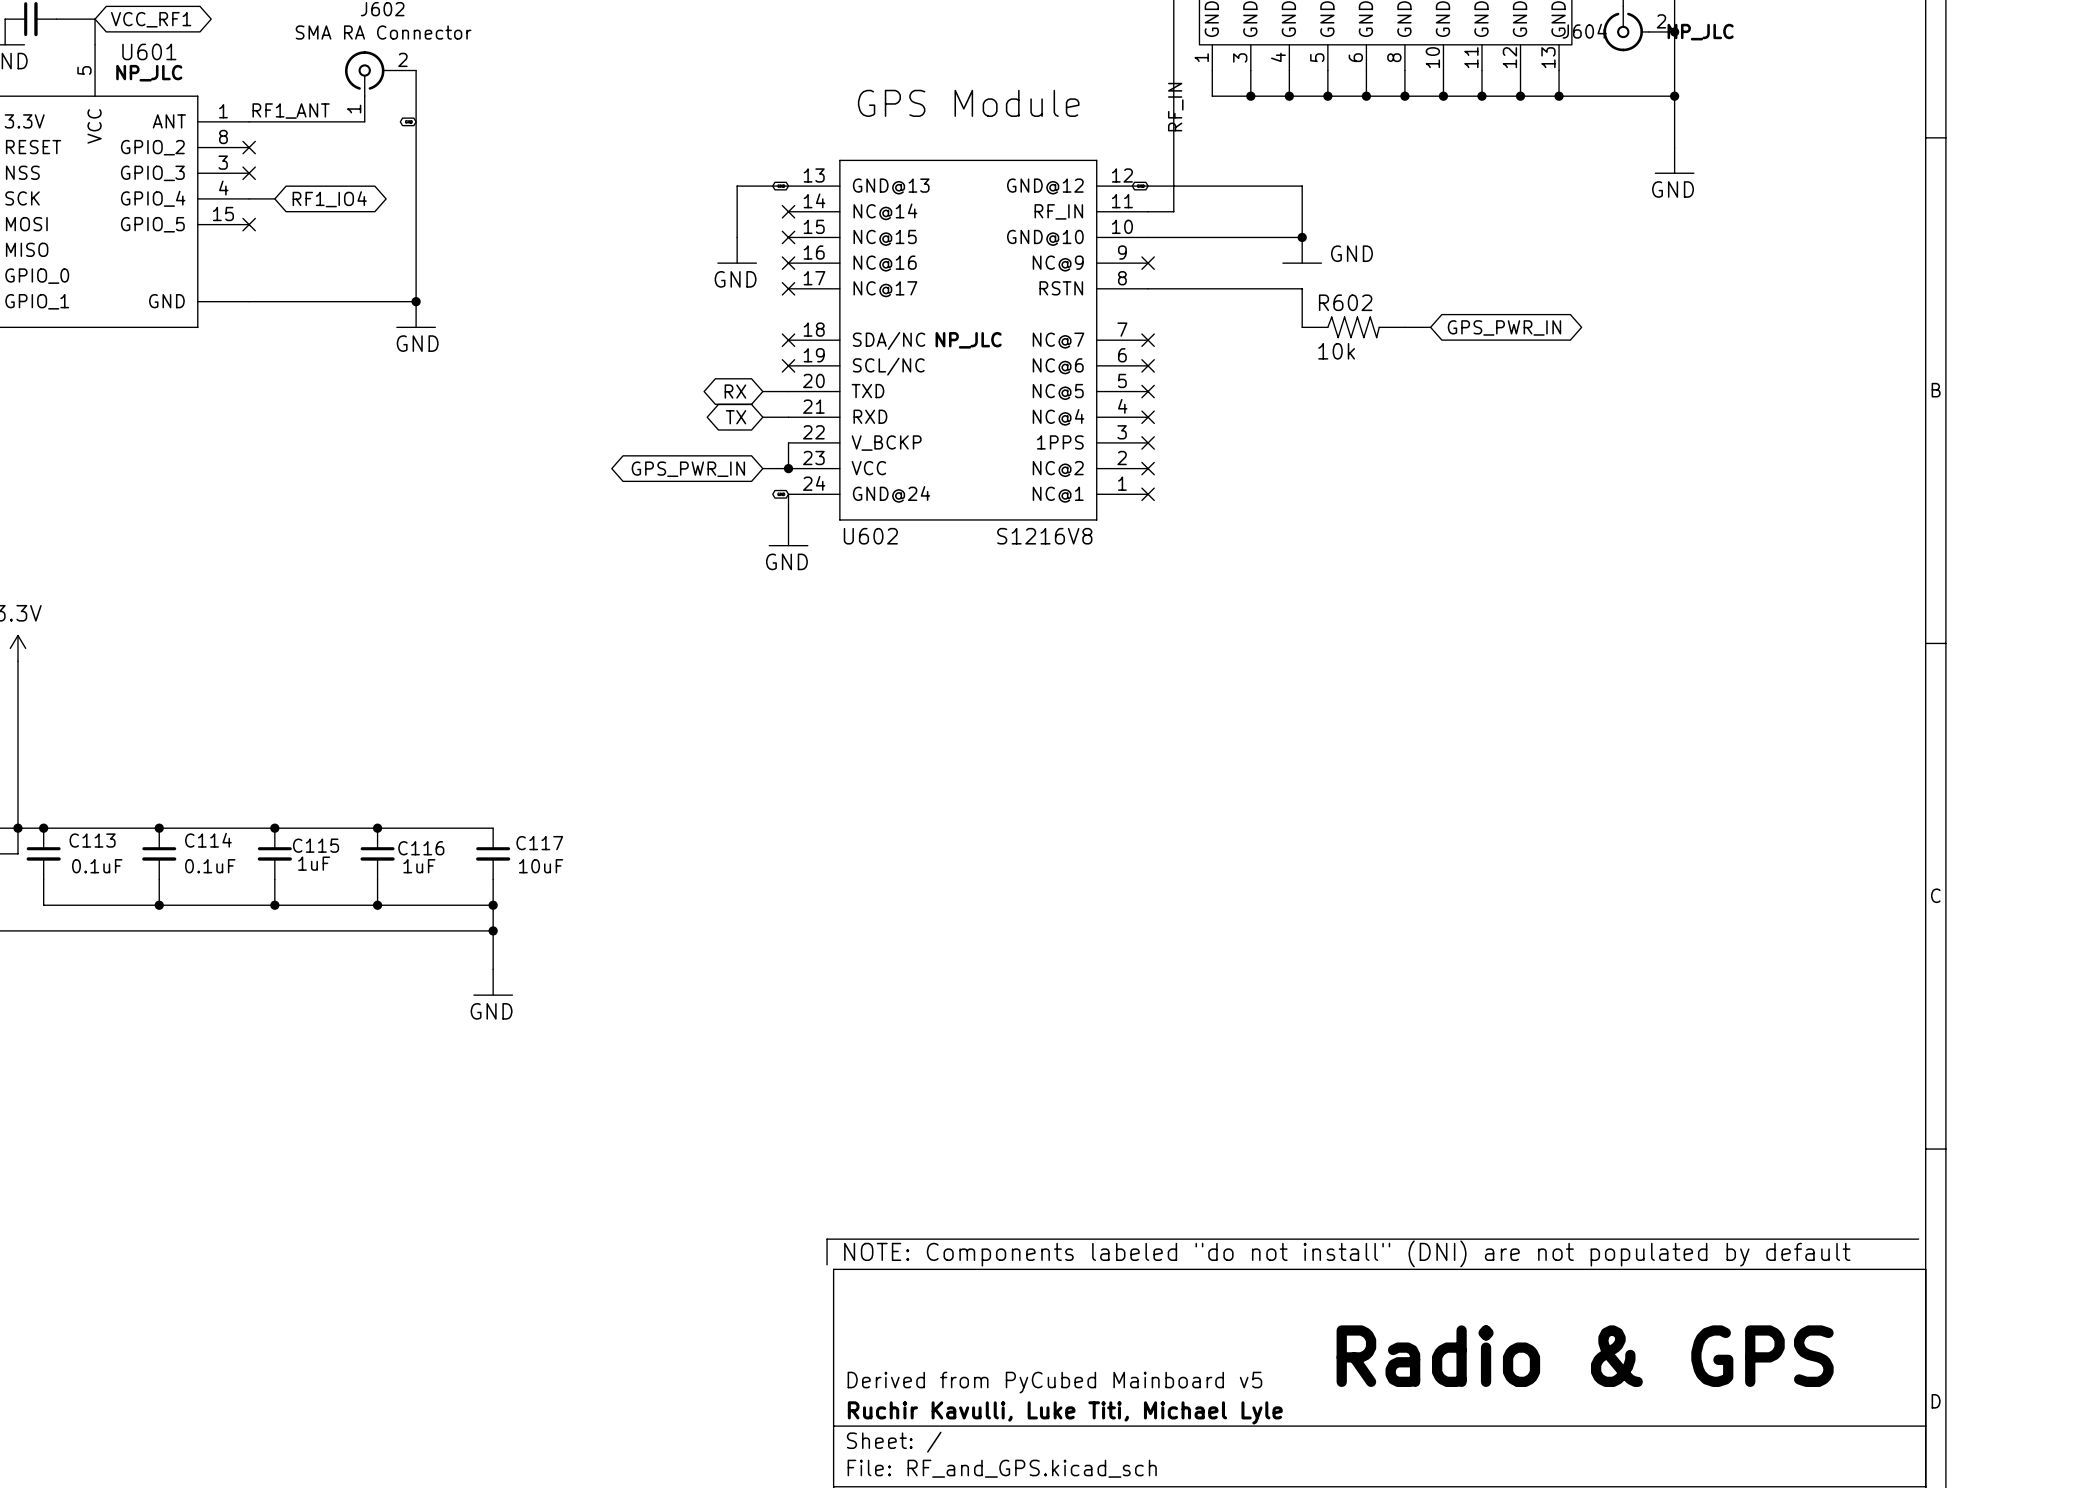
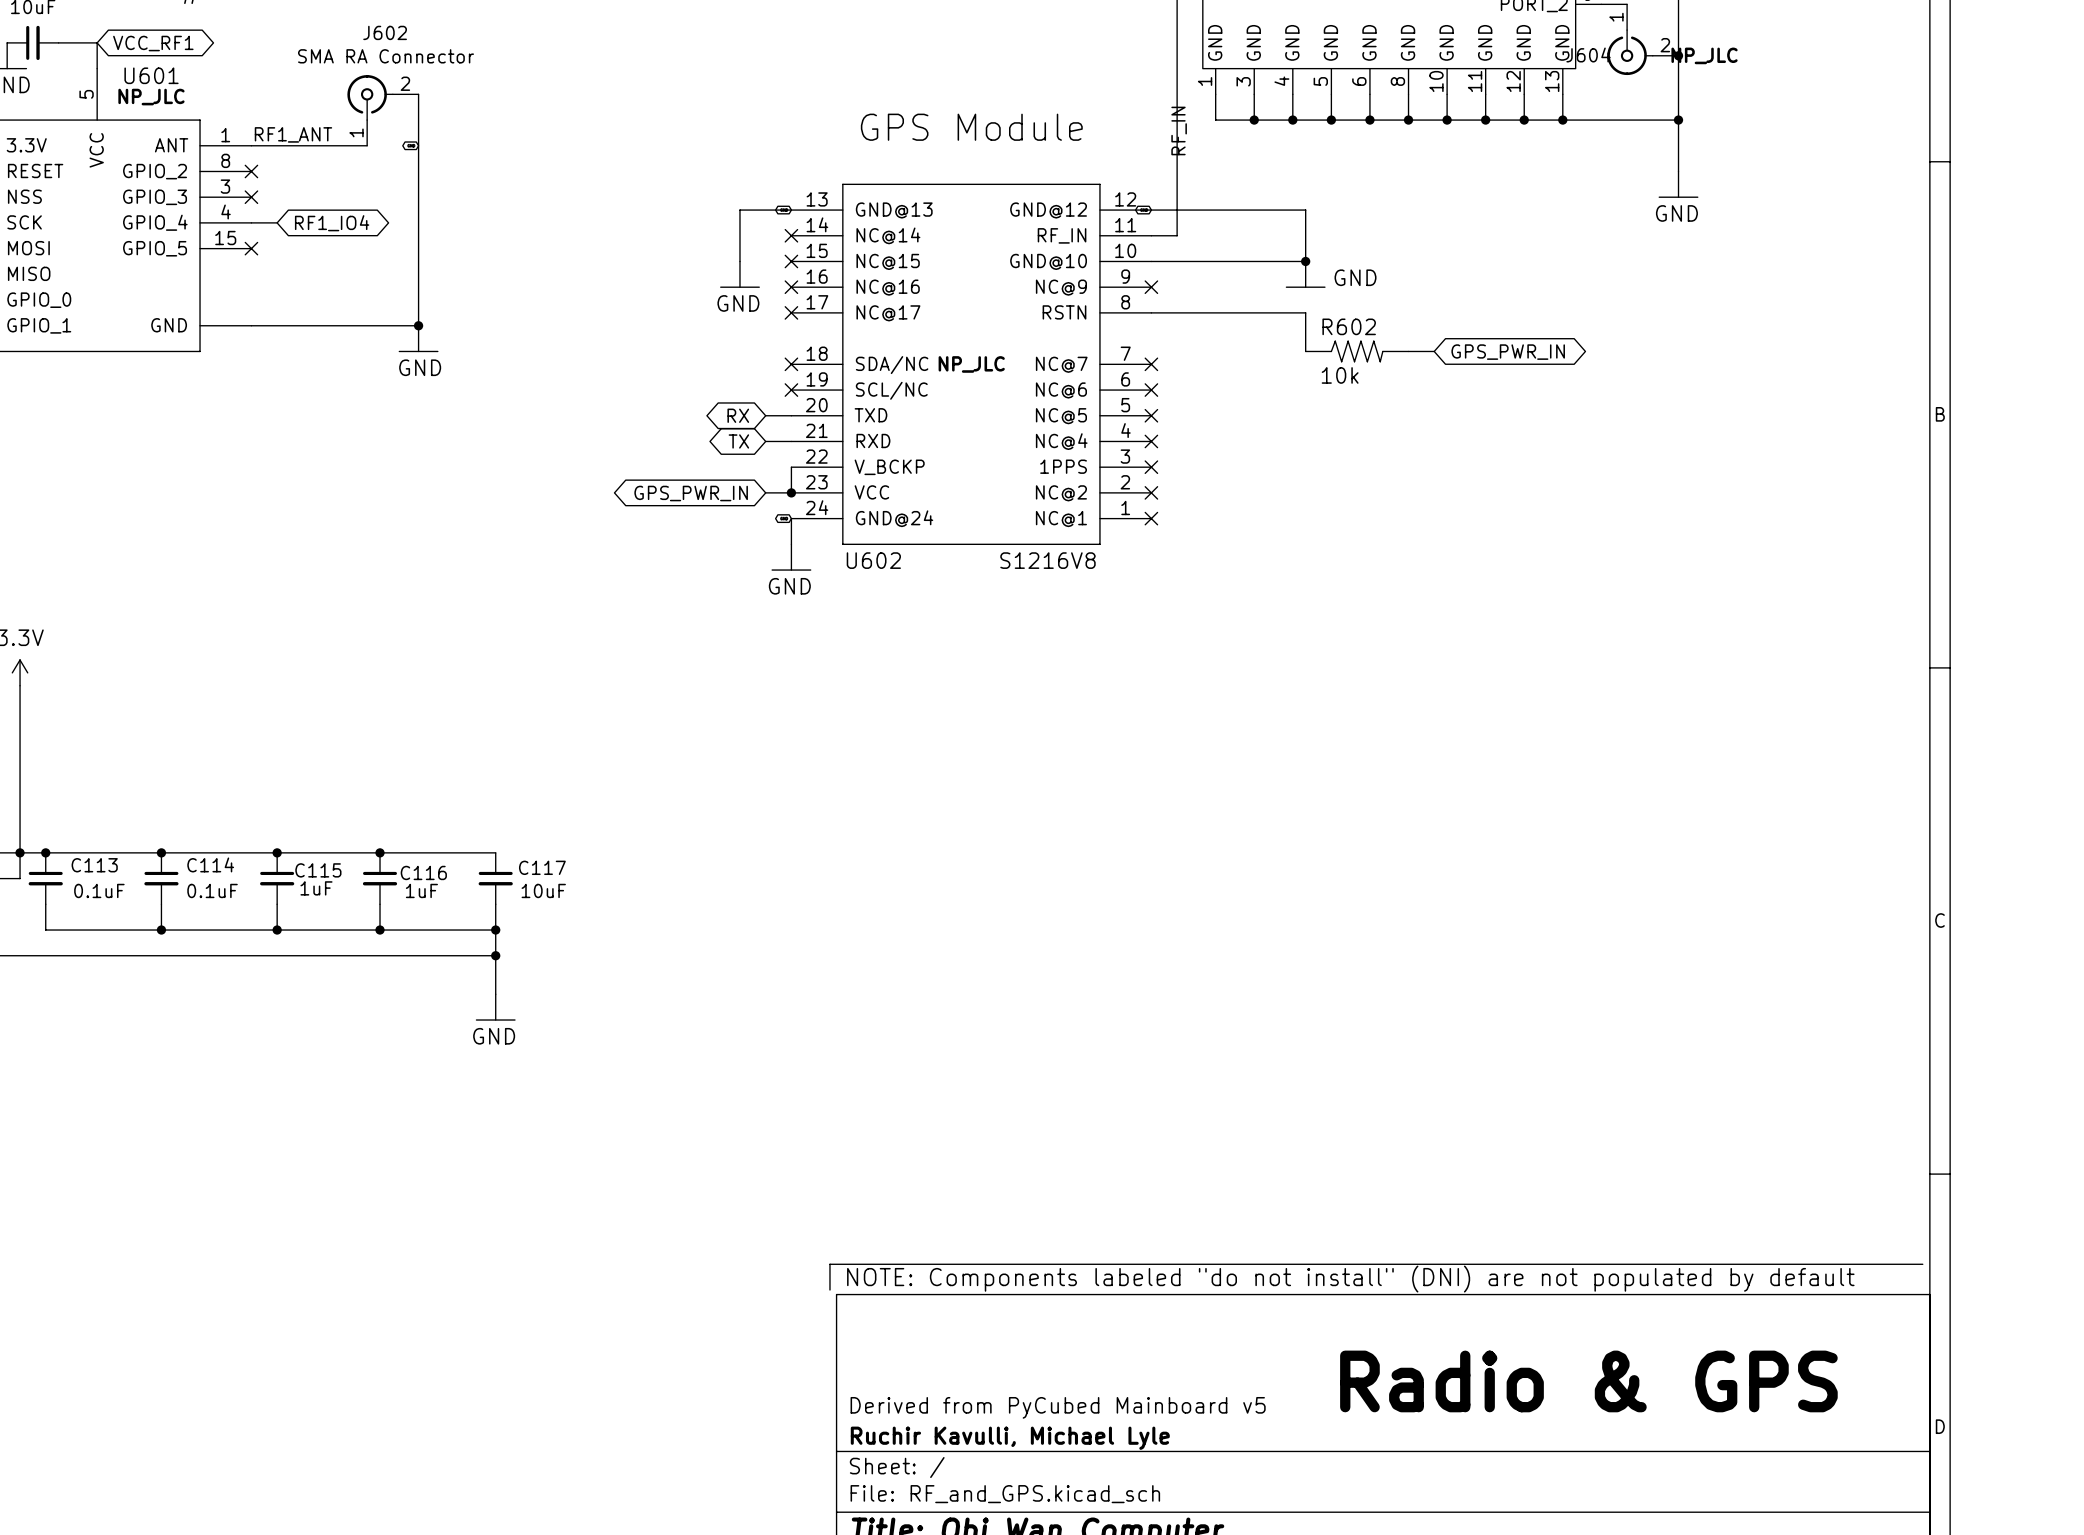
title block: Ruchir Kavulli, Luke Titi, Michael Lyle (1065, 1412) -> Ruchir Kavulli, Michael Lyle (1010, 1438)

